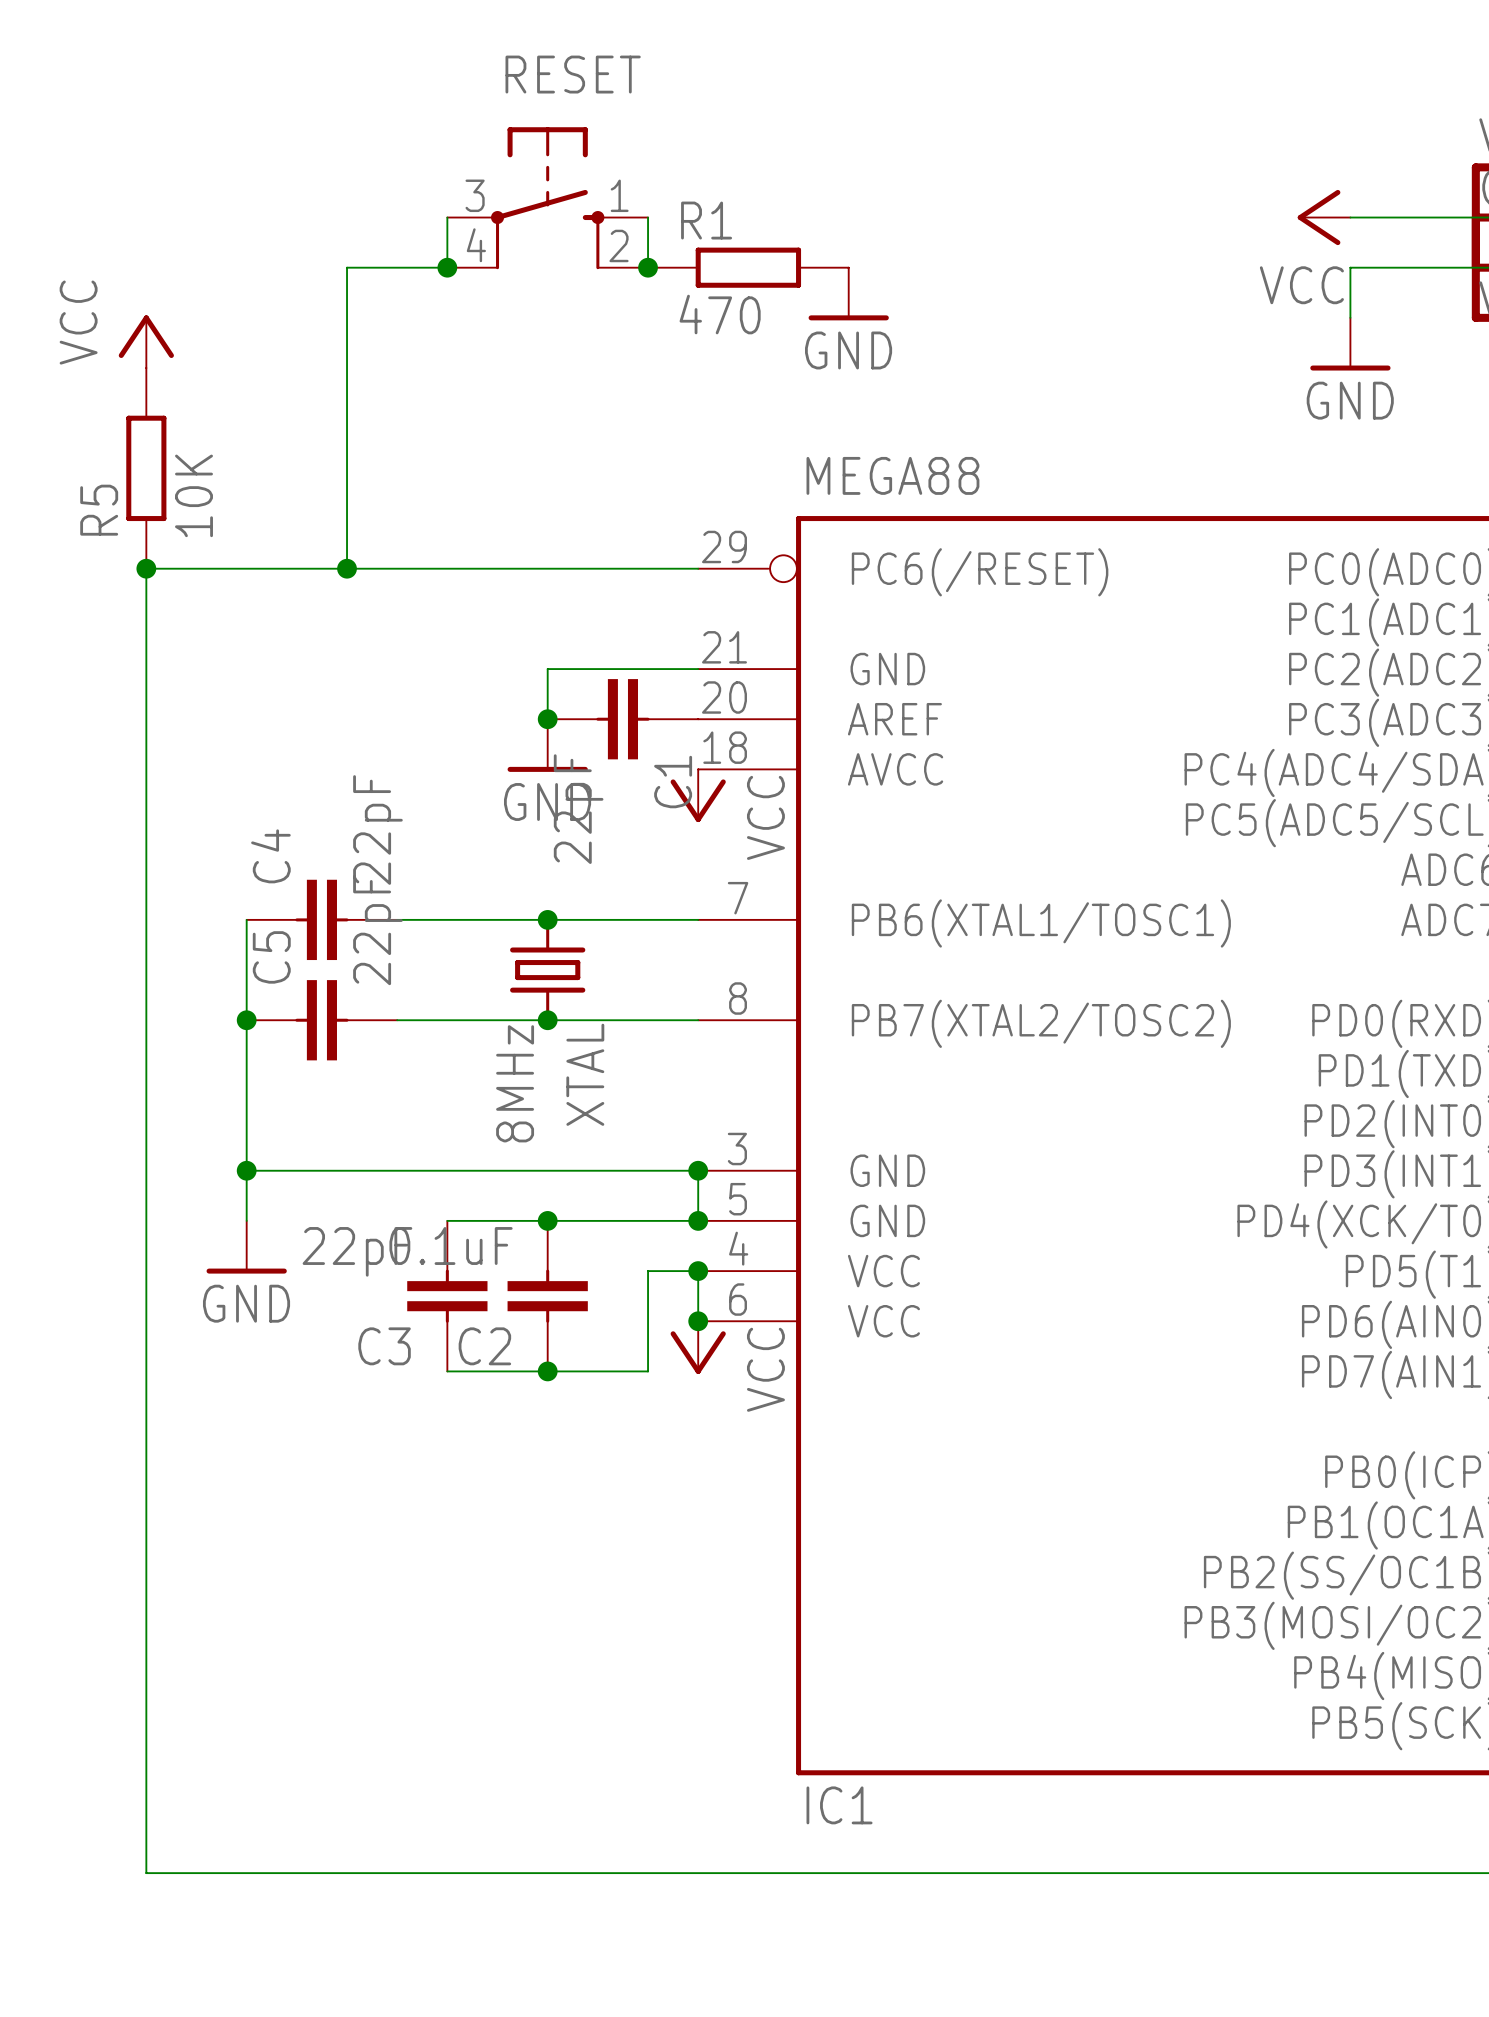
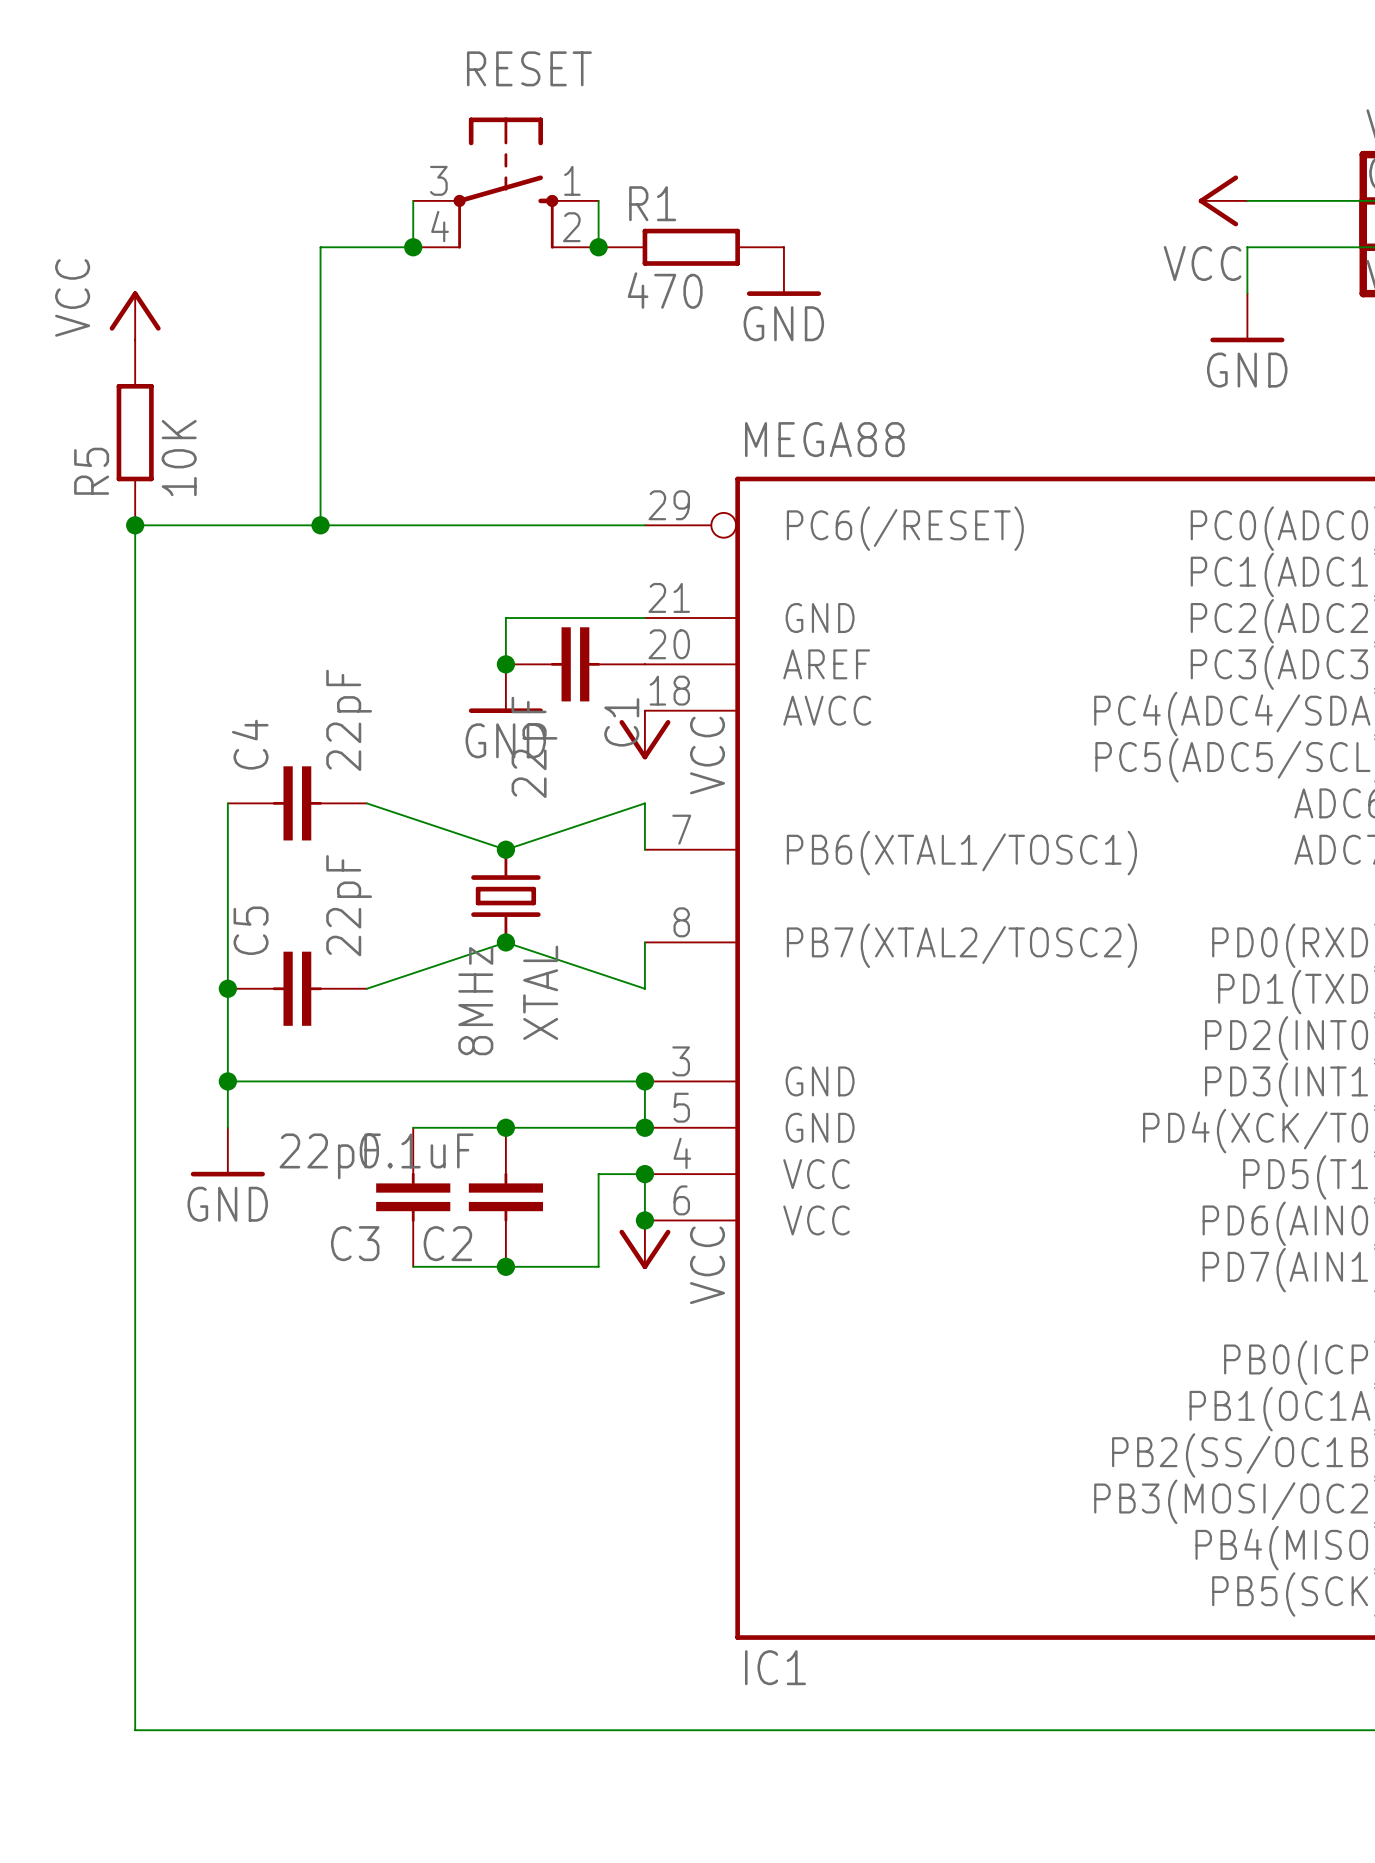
wire: none -> (227, 803) (227, 849)
C4 position: (321, 919) -> (297, 803)
wire: (397, 919) (698, 919) -> (366, 803) (505, 849) (644, 803) (644, 849)
junction position: (246, 1020) -> (227, 988)
C5 position: (321, 1020) -> (297, 988)
wire: (397, 1020) (698, 1020) -> (366, 988) (505, 942) (644, 988) (644, 942)

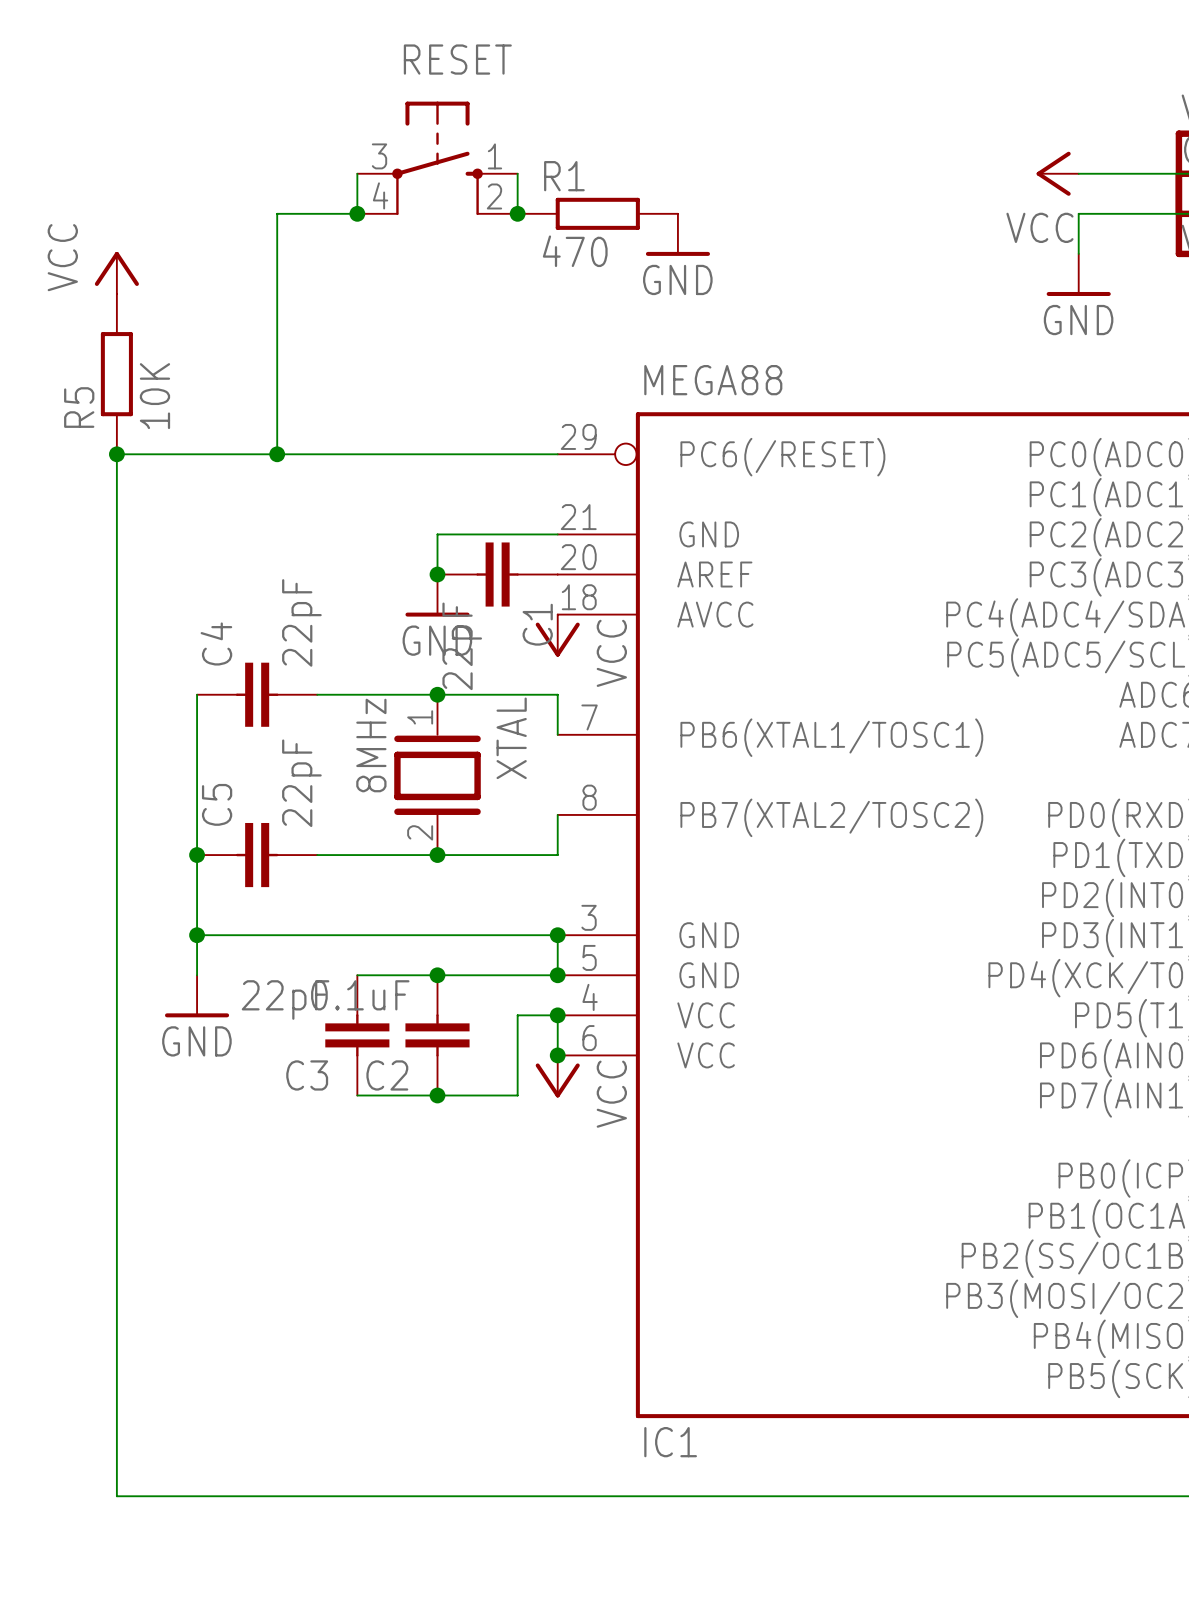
wire: (366, 803) (505, 849) (644, 803) -> (317, 694) (557, 694)
XTAL symbol: [471, 848, 541, 944] -> [394, 694, 481, 856]
junction position: (505, 849) -> (437, 694)
junction position: (505, 942) -> (437, 855)
wire: (366, 988) (505, 942) (644, 988) -> (317, 855) (557, 855)
XTAL name position: XTAL (540, 992) -> XTAL (511, 738)
XTAL value position: 8MHz (475, 1001) -> 8MHz (371, 745)

